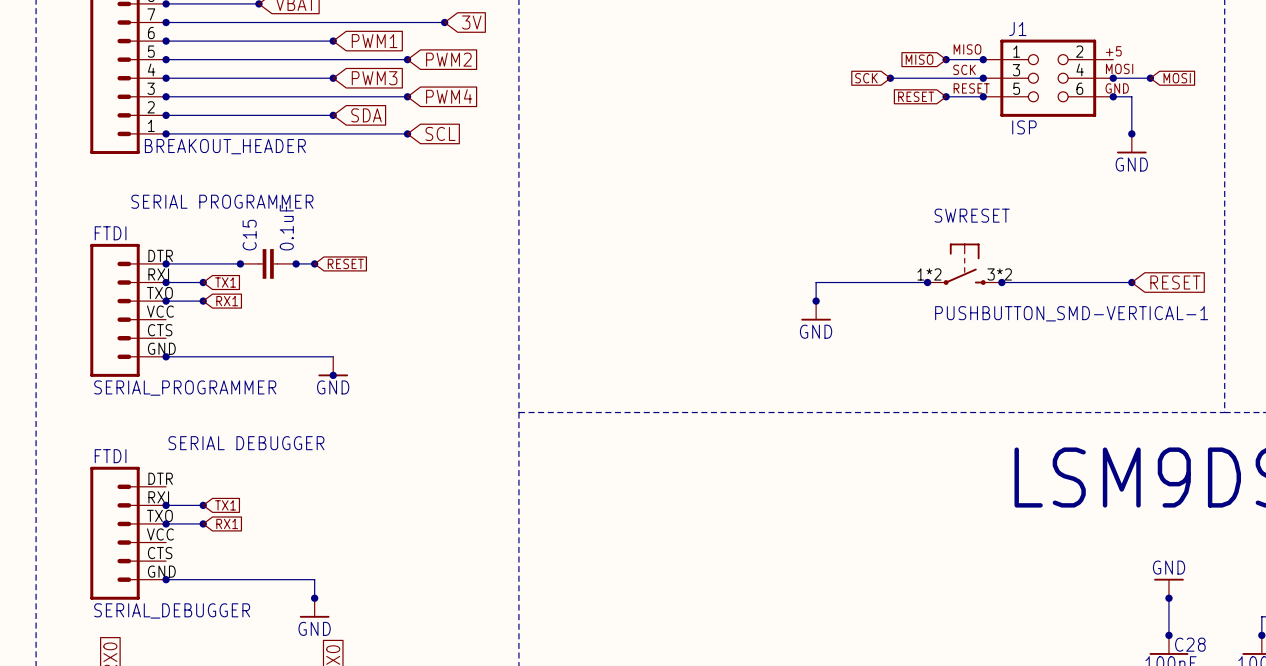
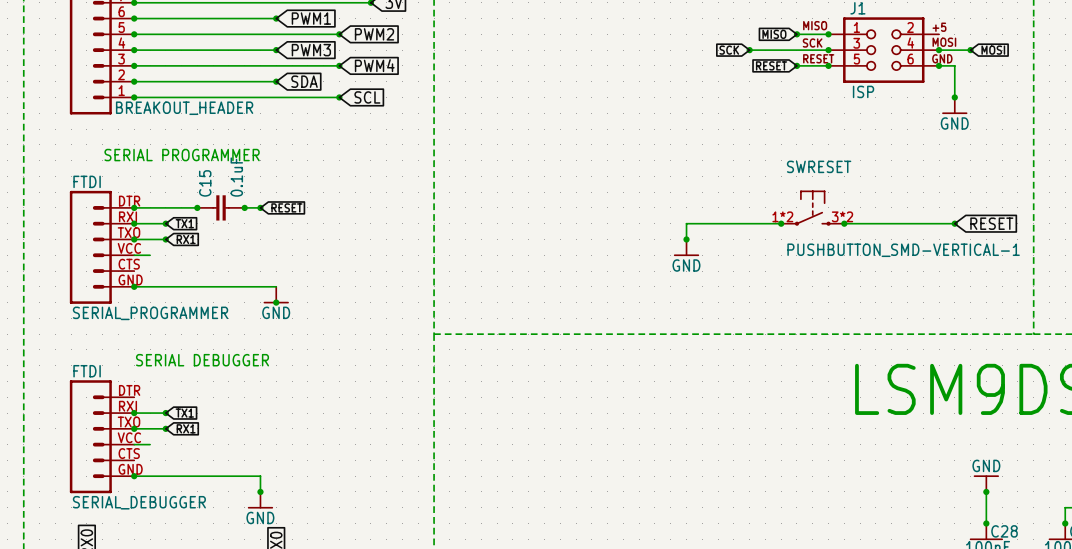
wire: none -> (134, 255) (150, 255)
wire: none -> (134, 444) (150, 444)

